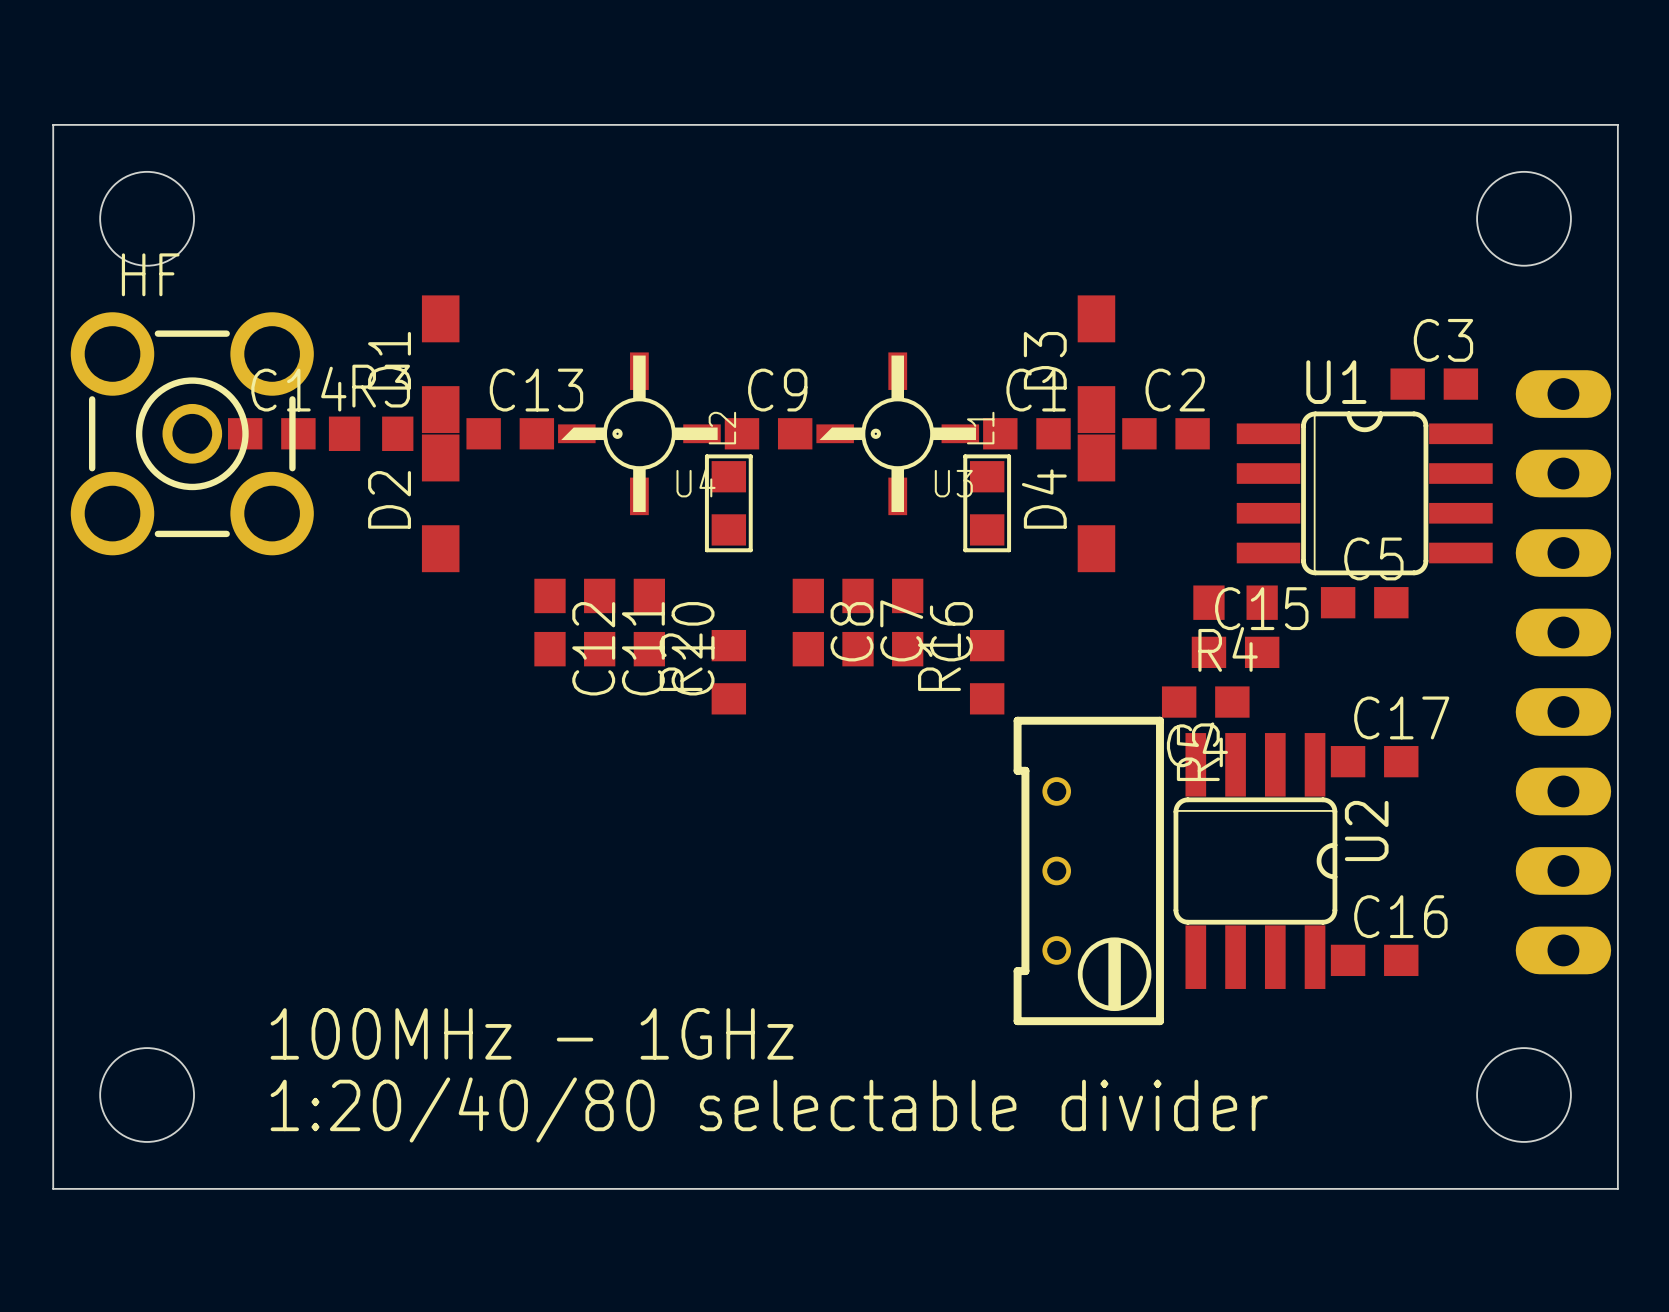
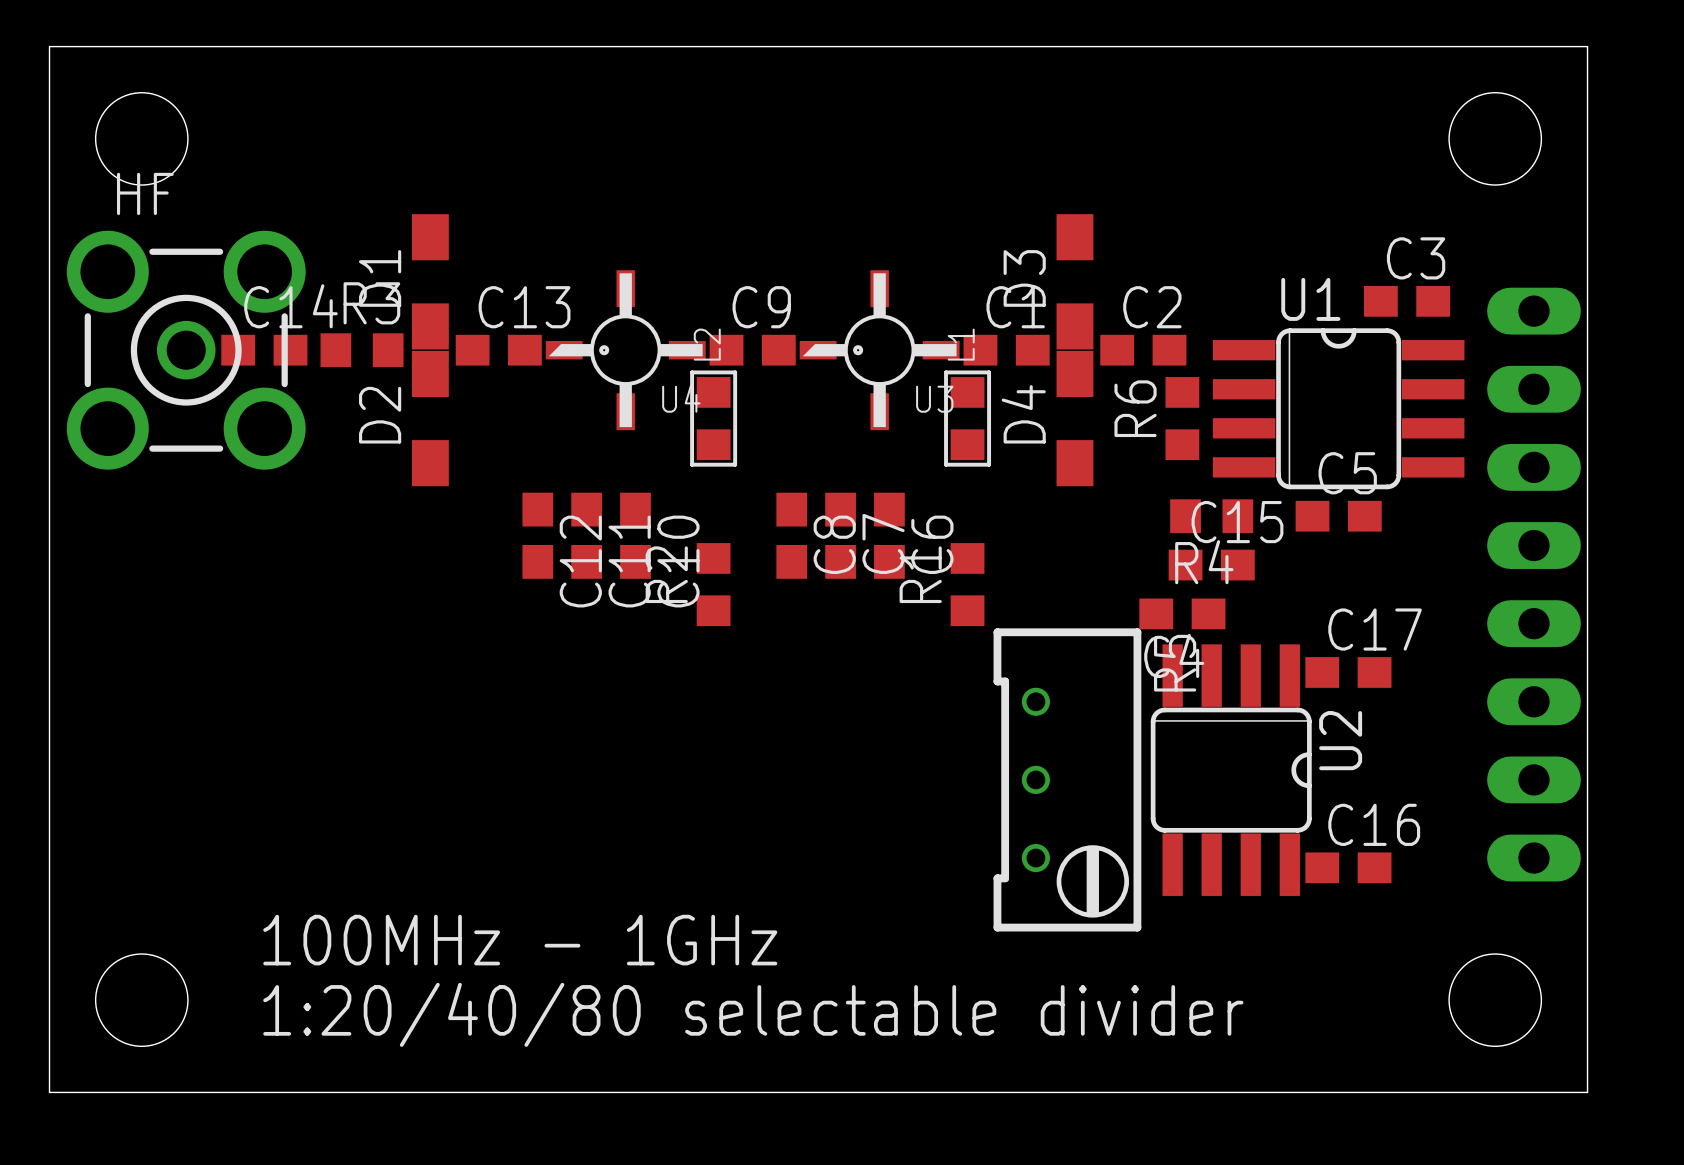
R6: none -> (1182, 418)

